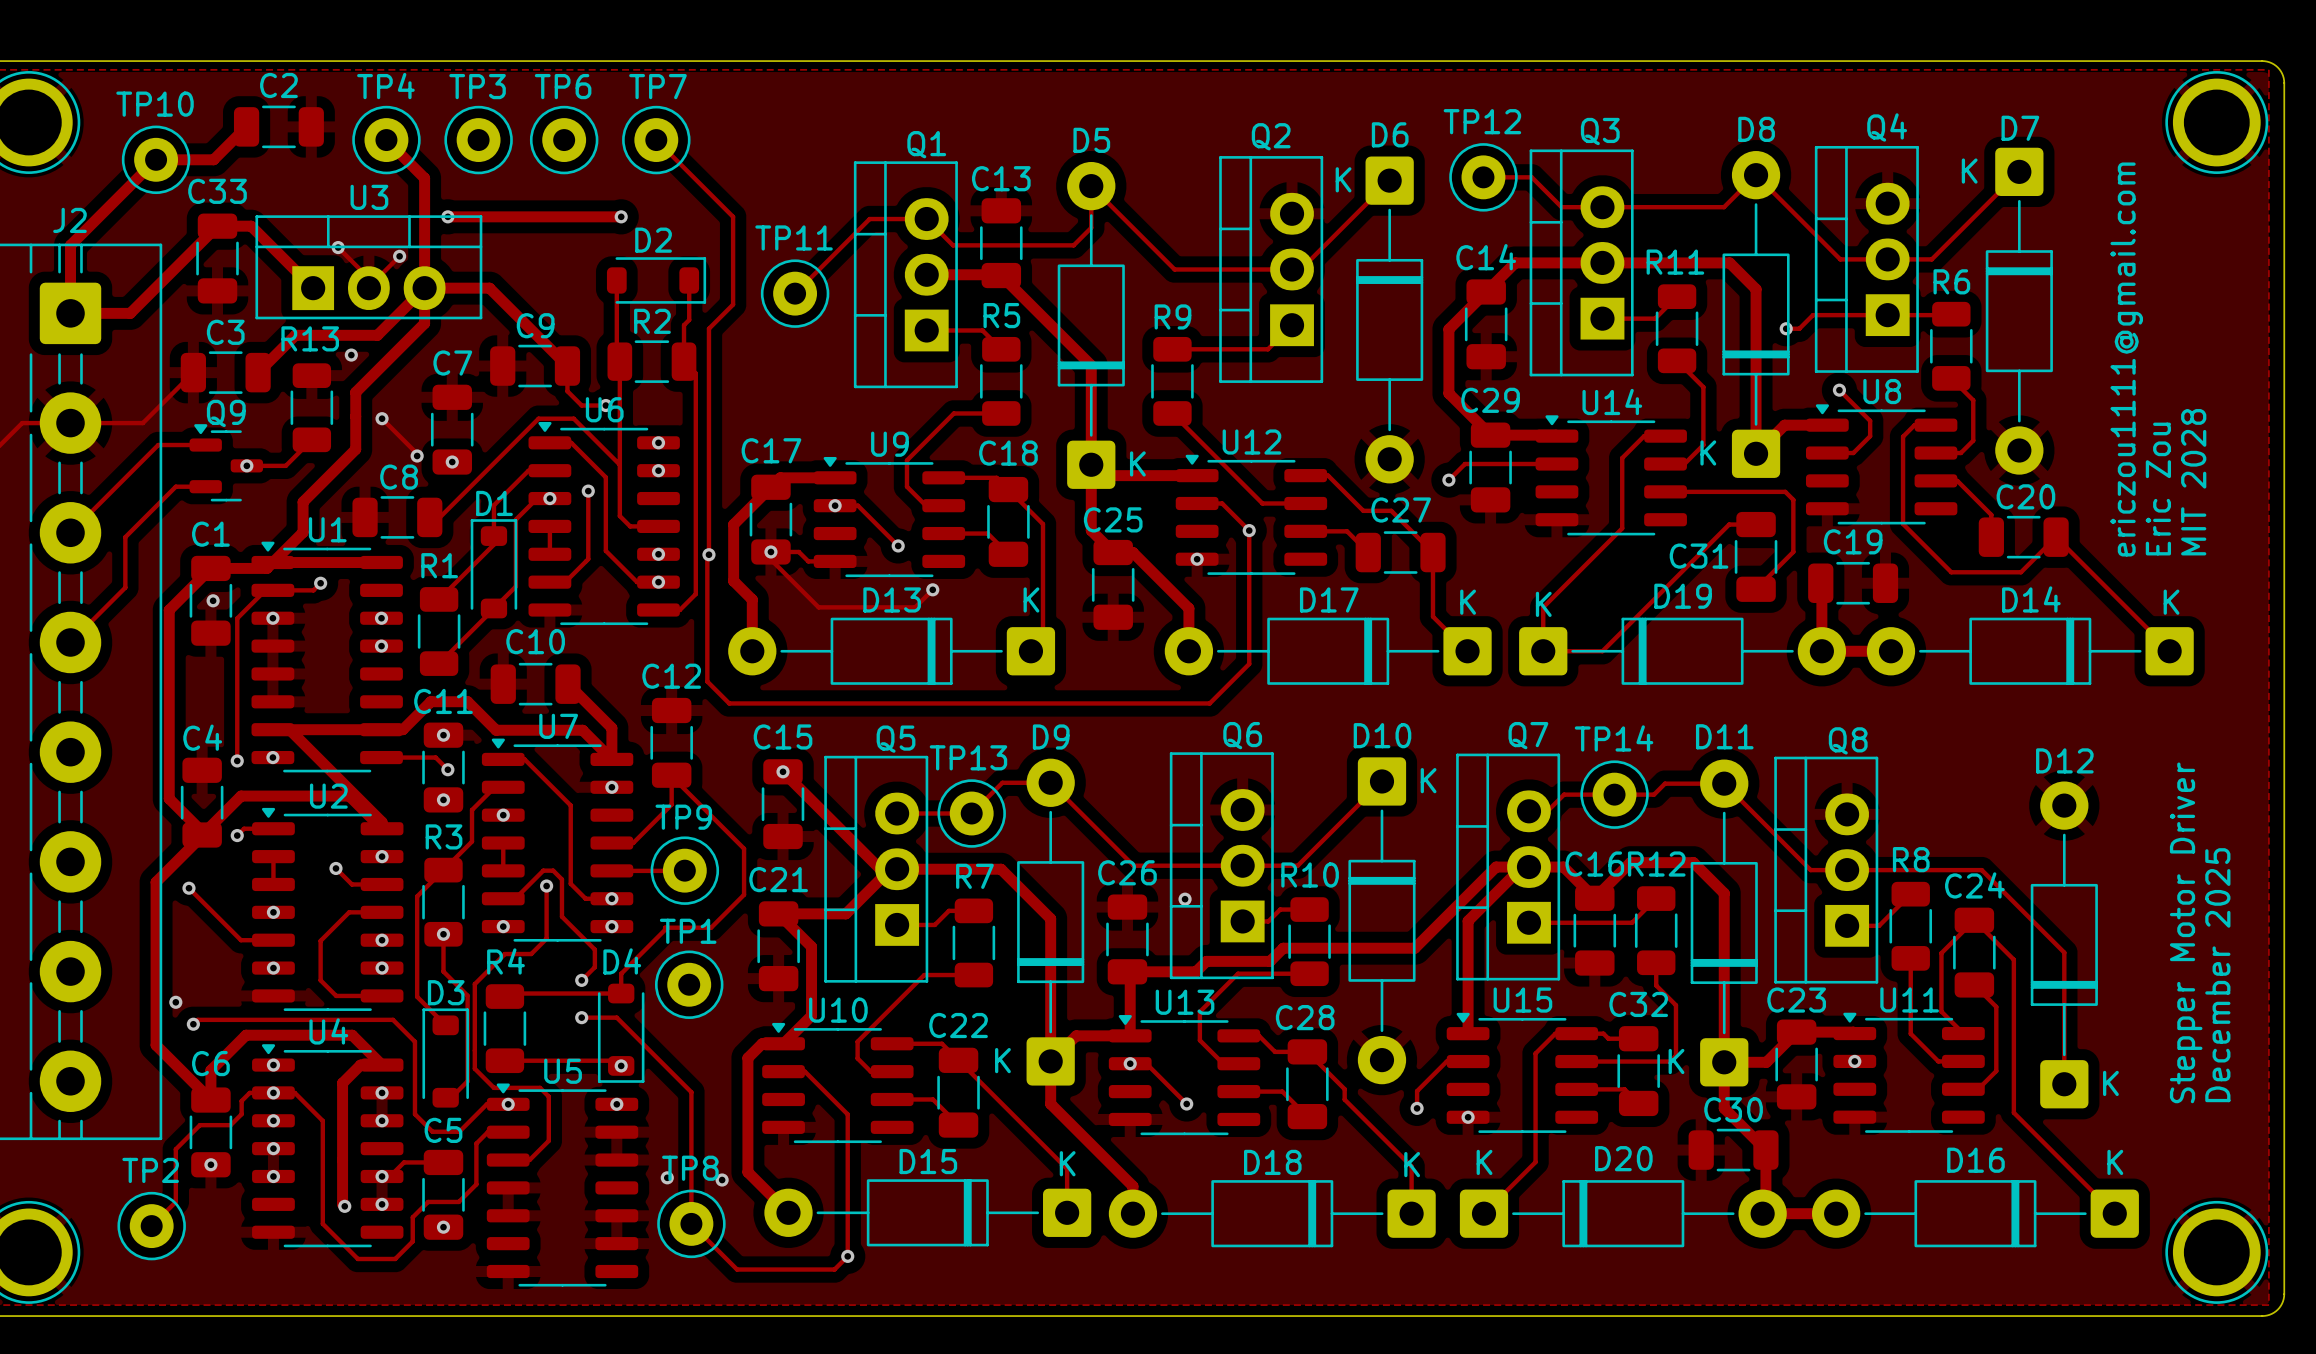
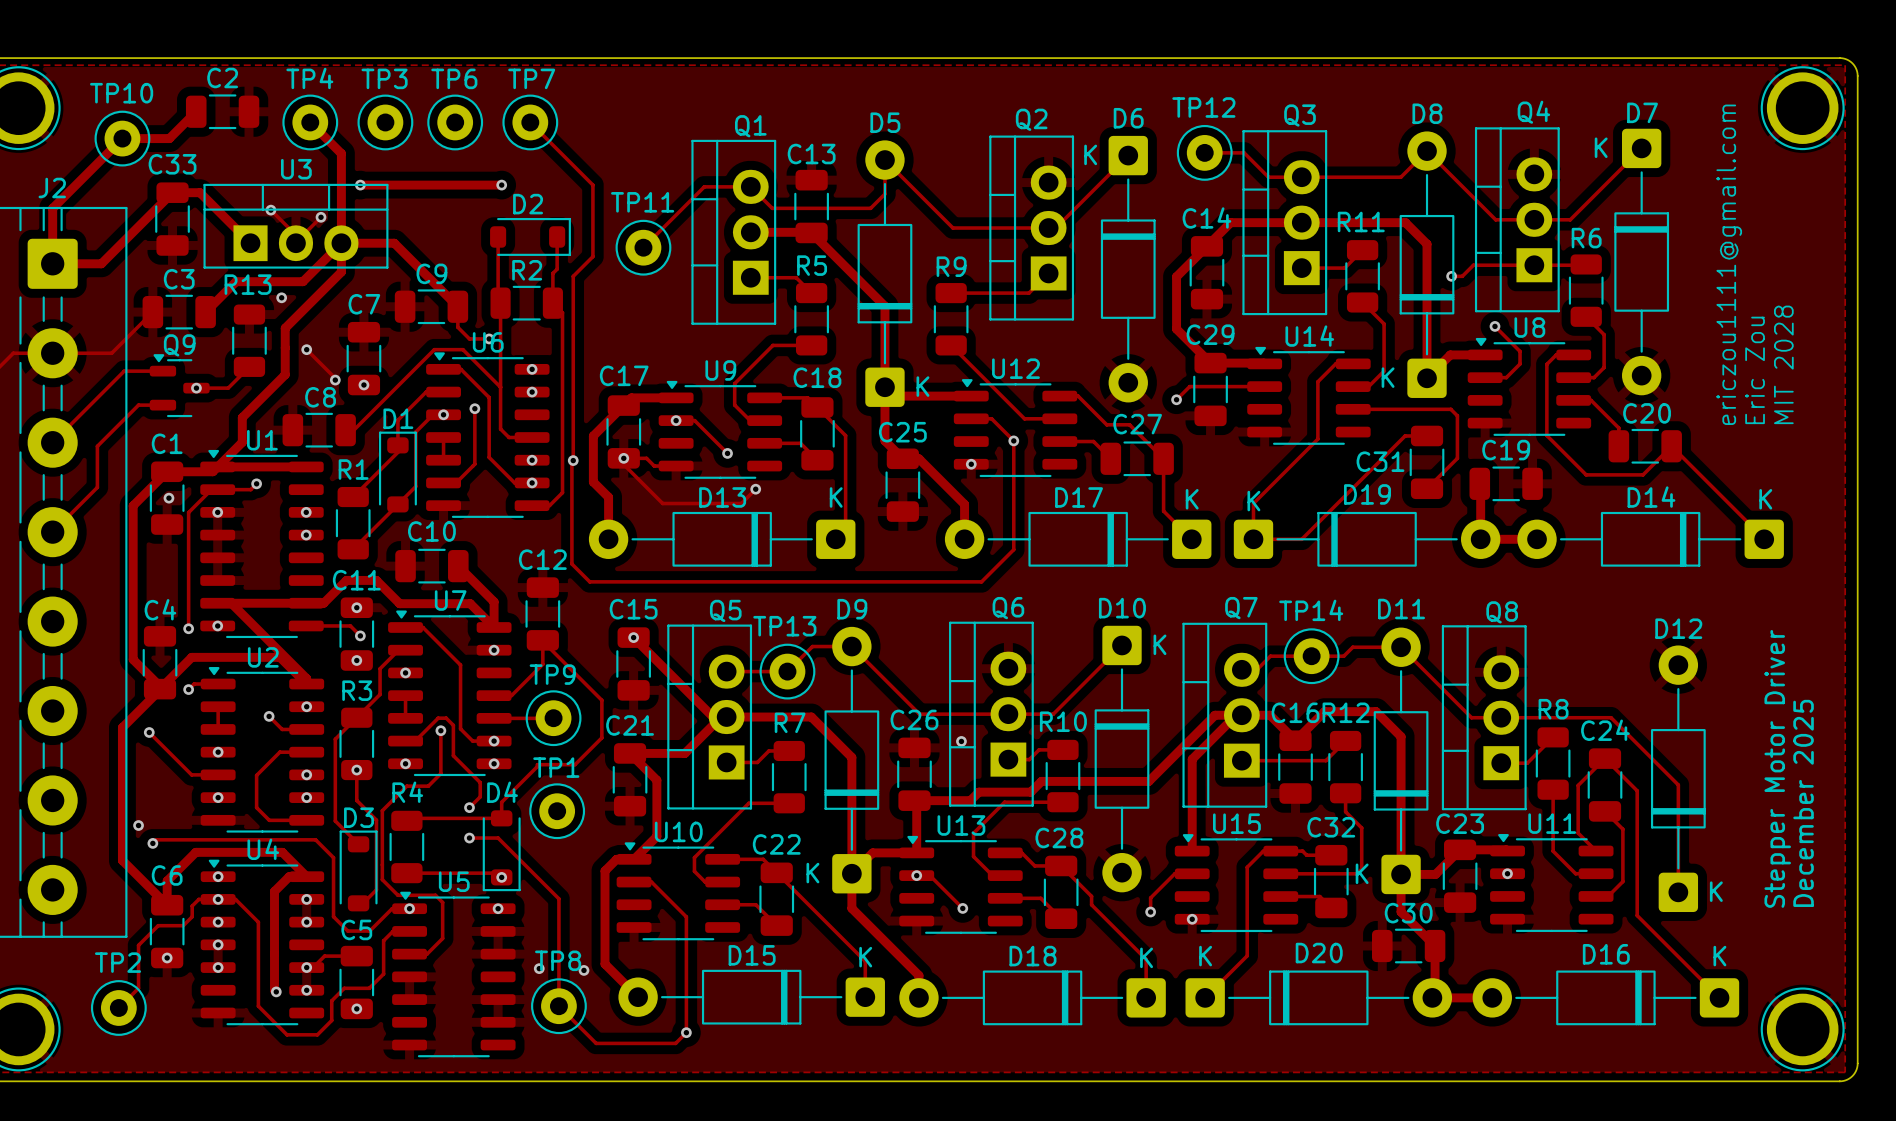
text position: ericzou1111@gmail.com (2126, 359) -> ericzou1111@gmail.com (1729, 264)
text position: MIT 2028 (2193, 482) -> MIT 2028 (1783, 364)
text position: Eric Zou (2158, 489) -> Eric Zou (1755, 370)

